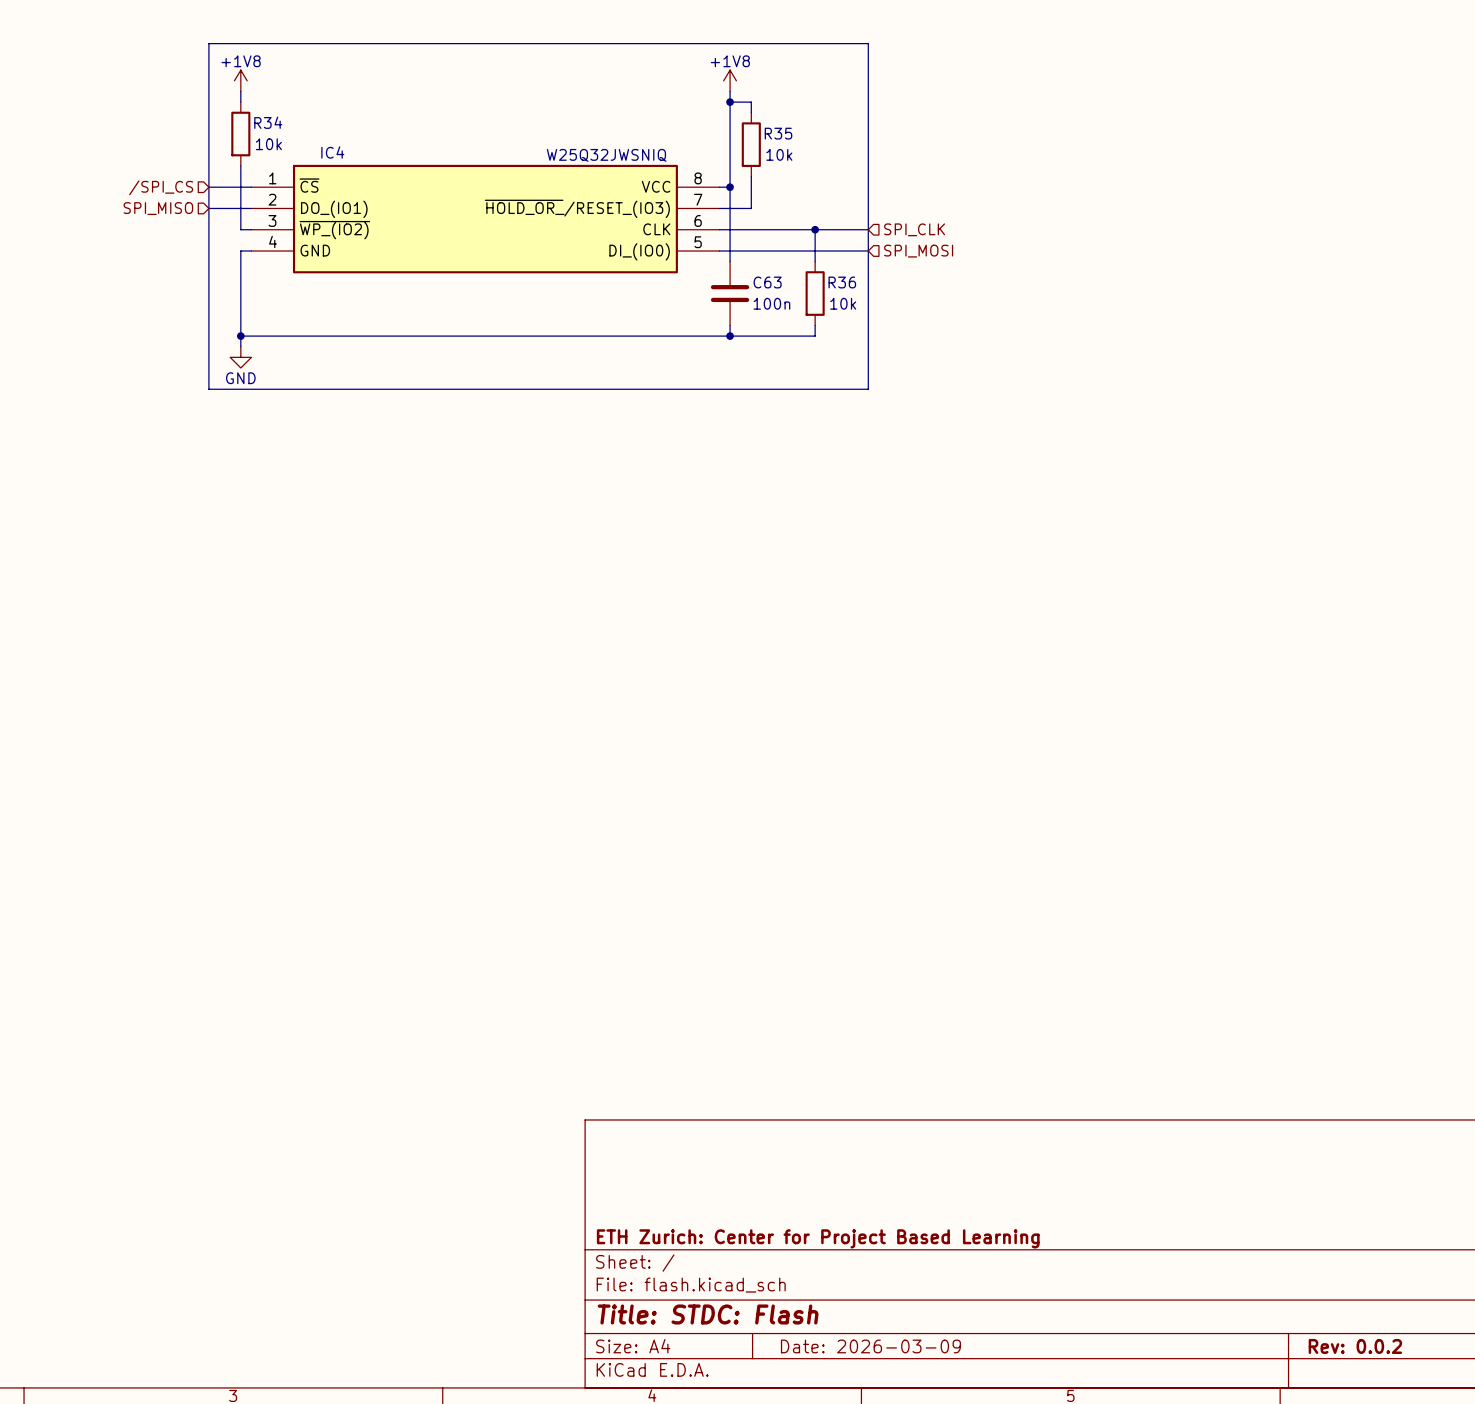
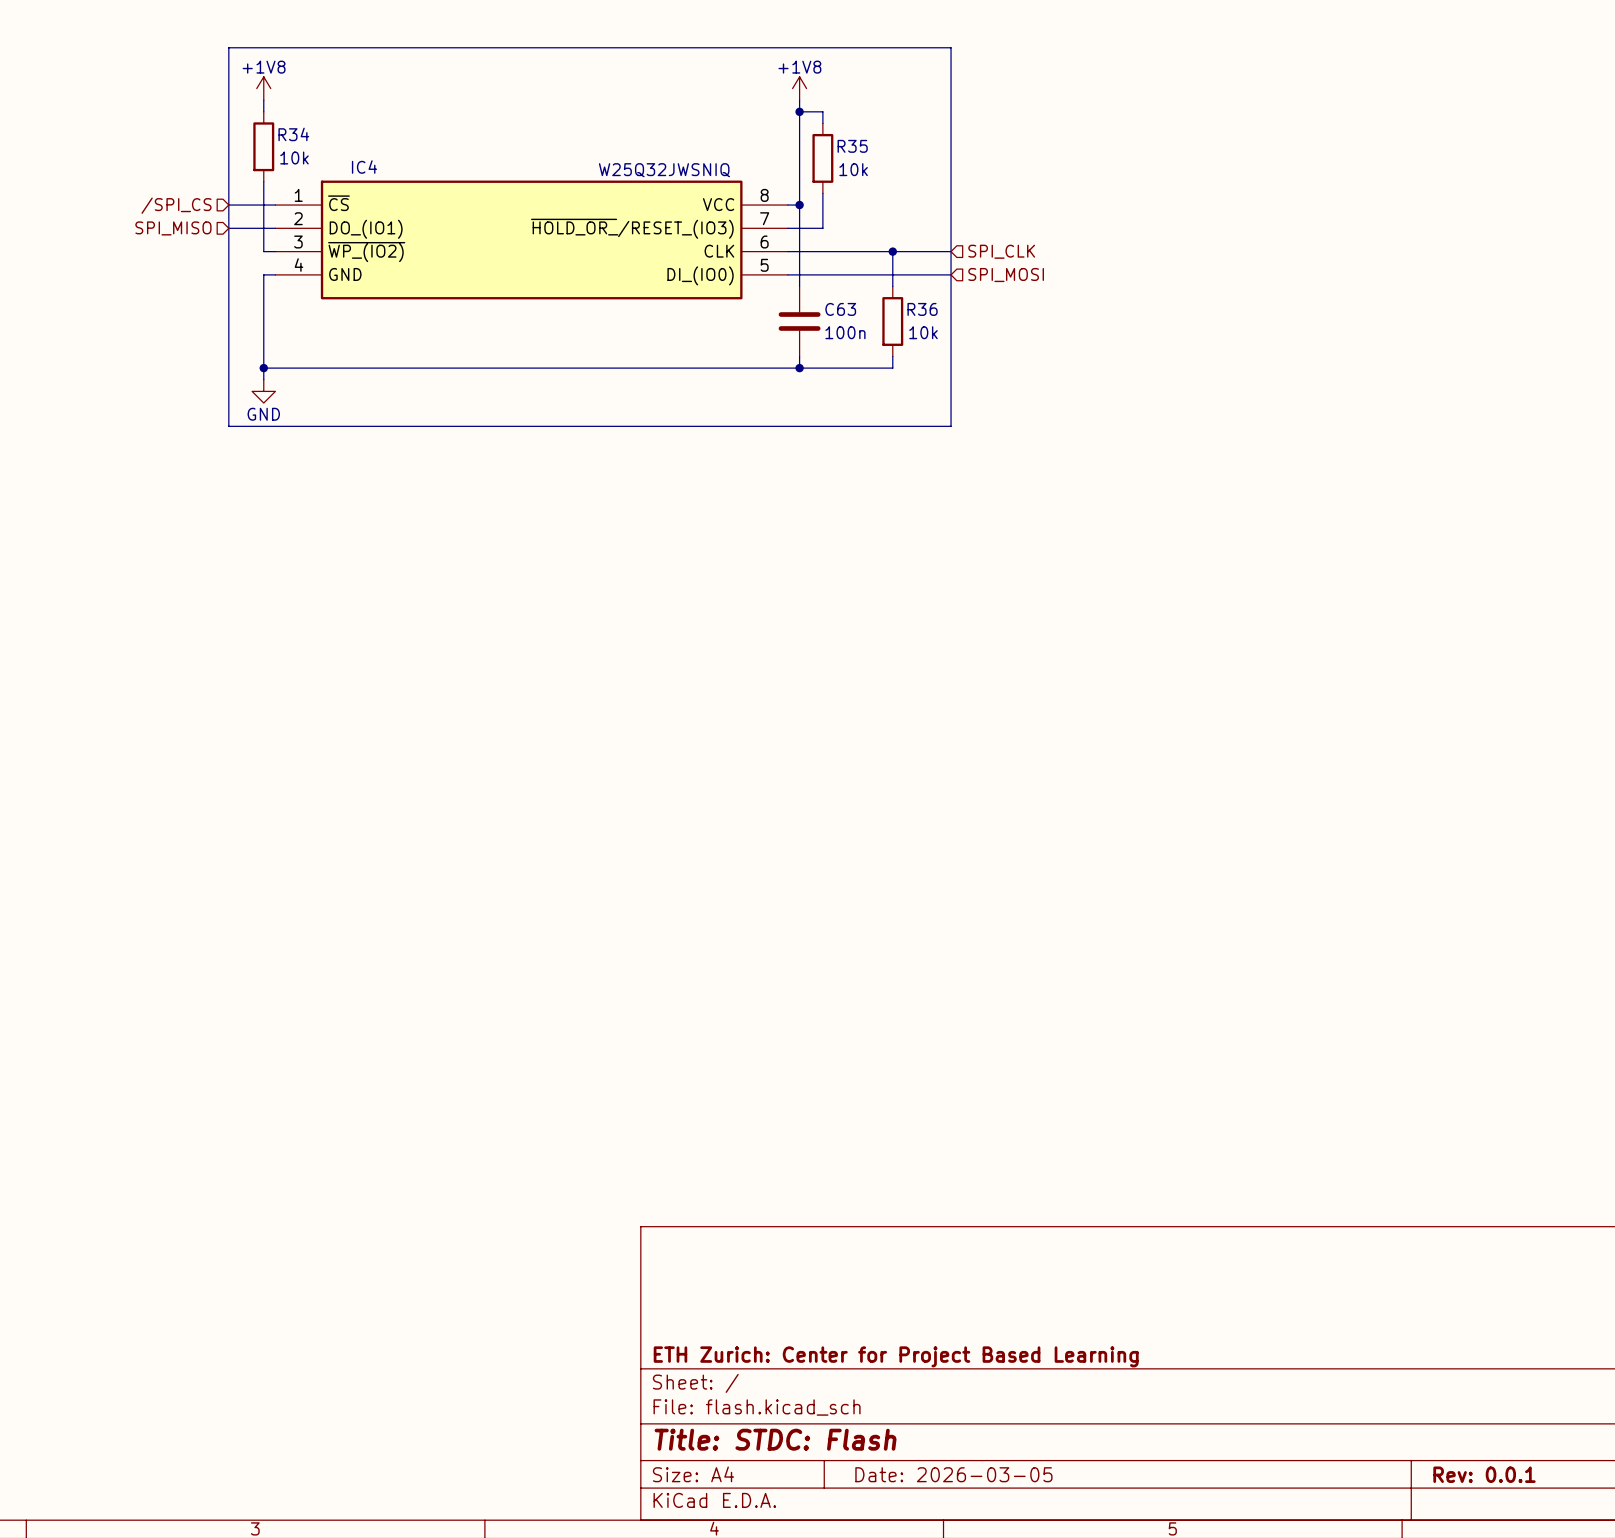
title block: Date: 2026-03-09 (870, 1346) -> Date: 2026-03-05 (953, 1474)
title block: Rev: 0.0.2 (1355, 1346) -> Rev: 0.0.1 (1484, 1474)

